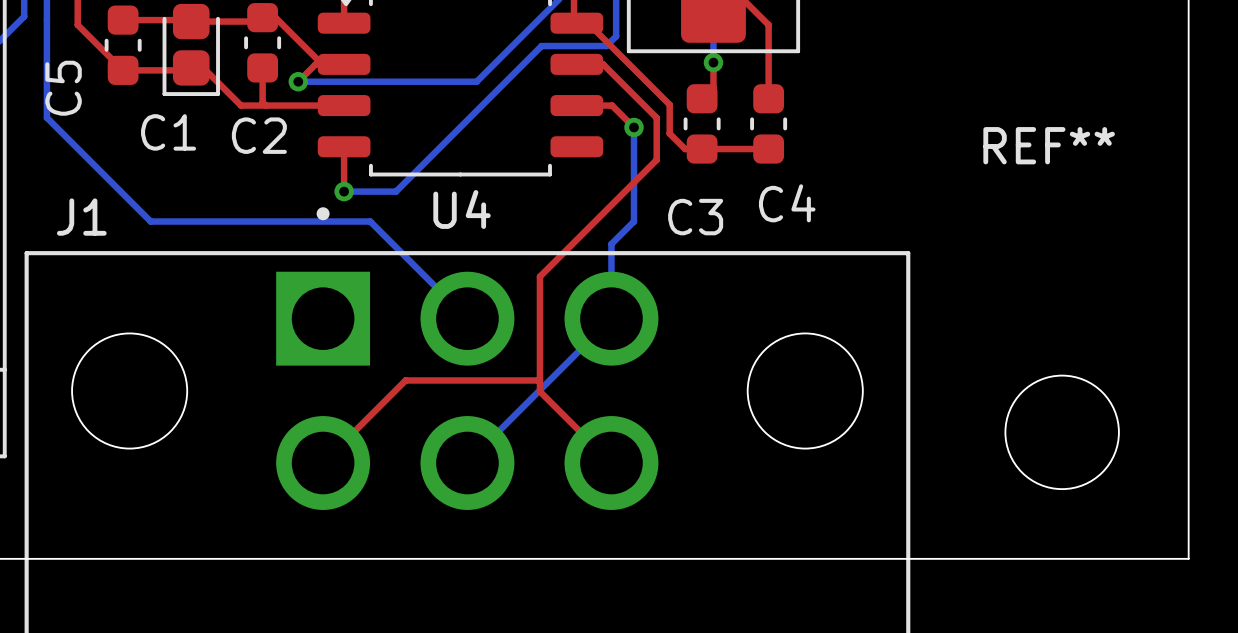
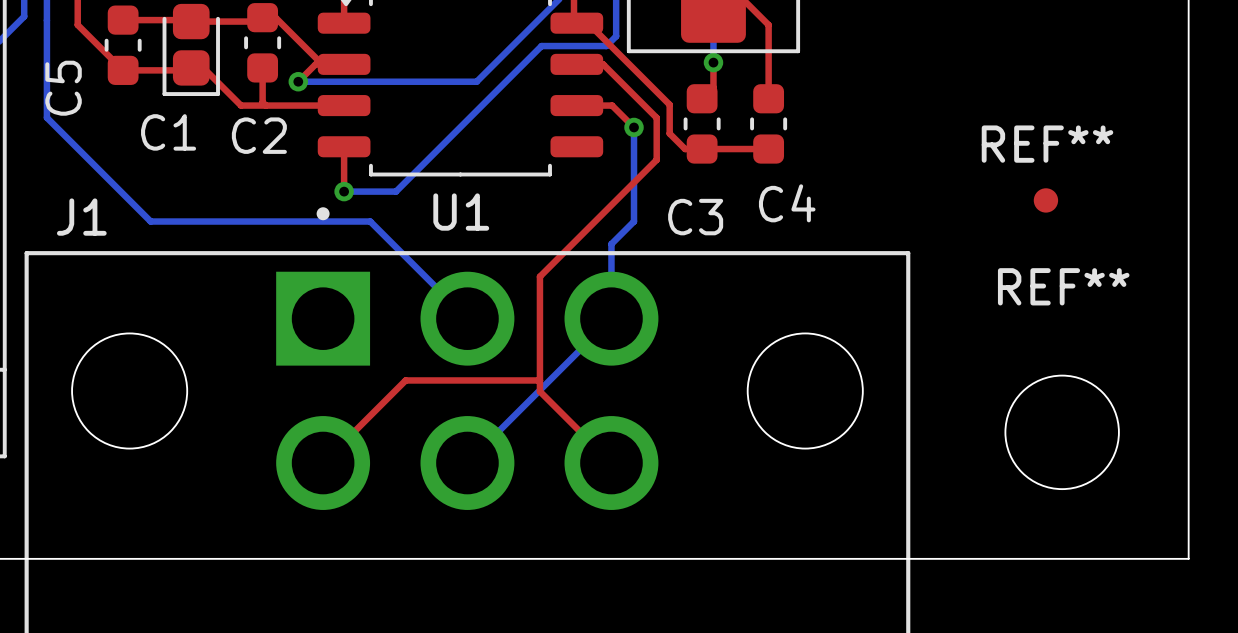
REF** name position: REF** (1049, 145) -> REF** (1063, 286)
REF**: none -> (1045, 200)
U4 name: U4 (462, 209) -> U1 (461, 212)

